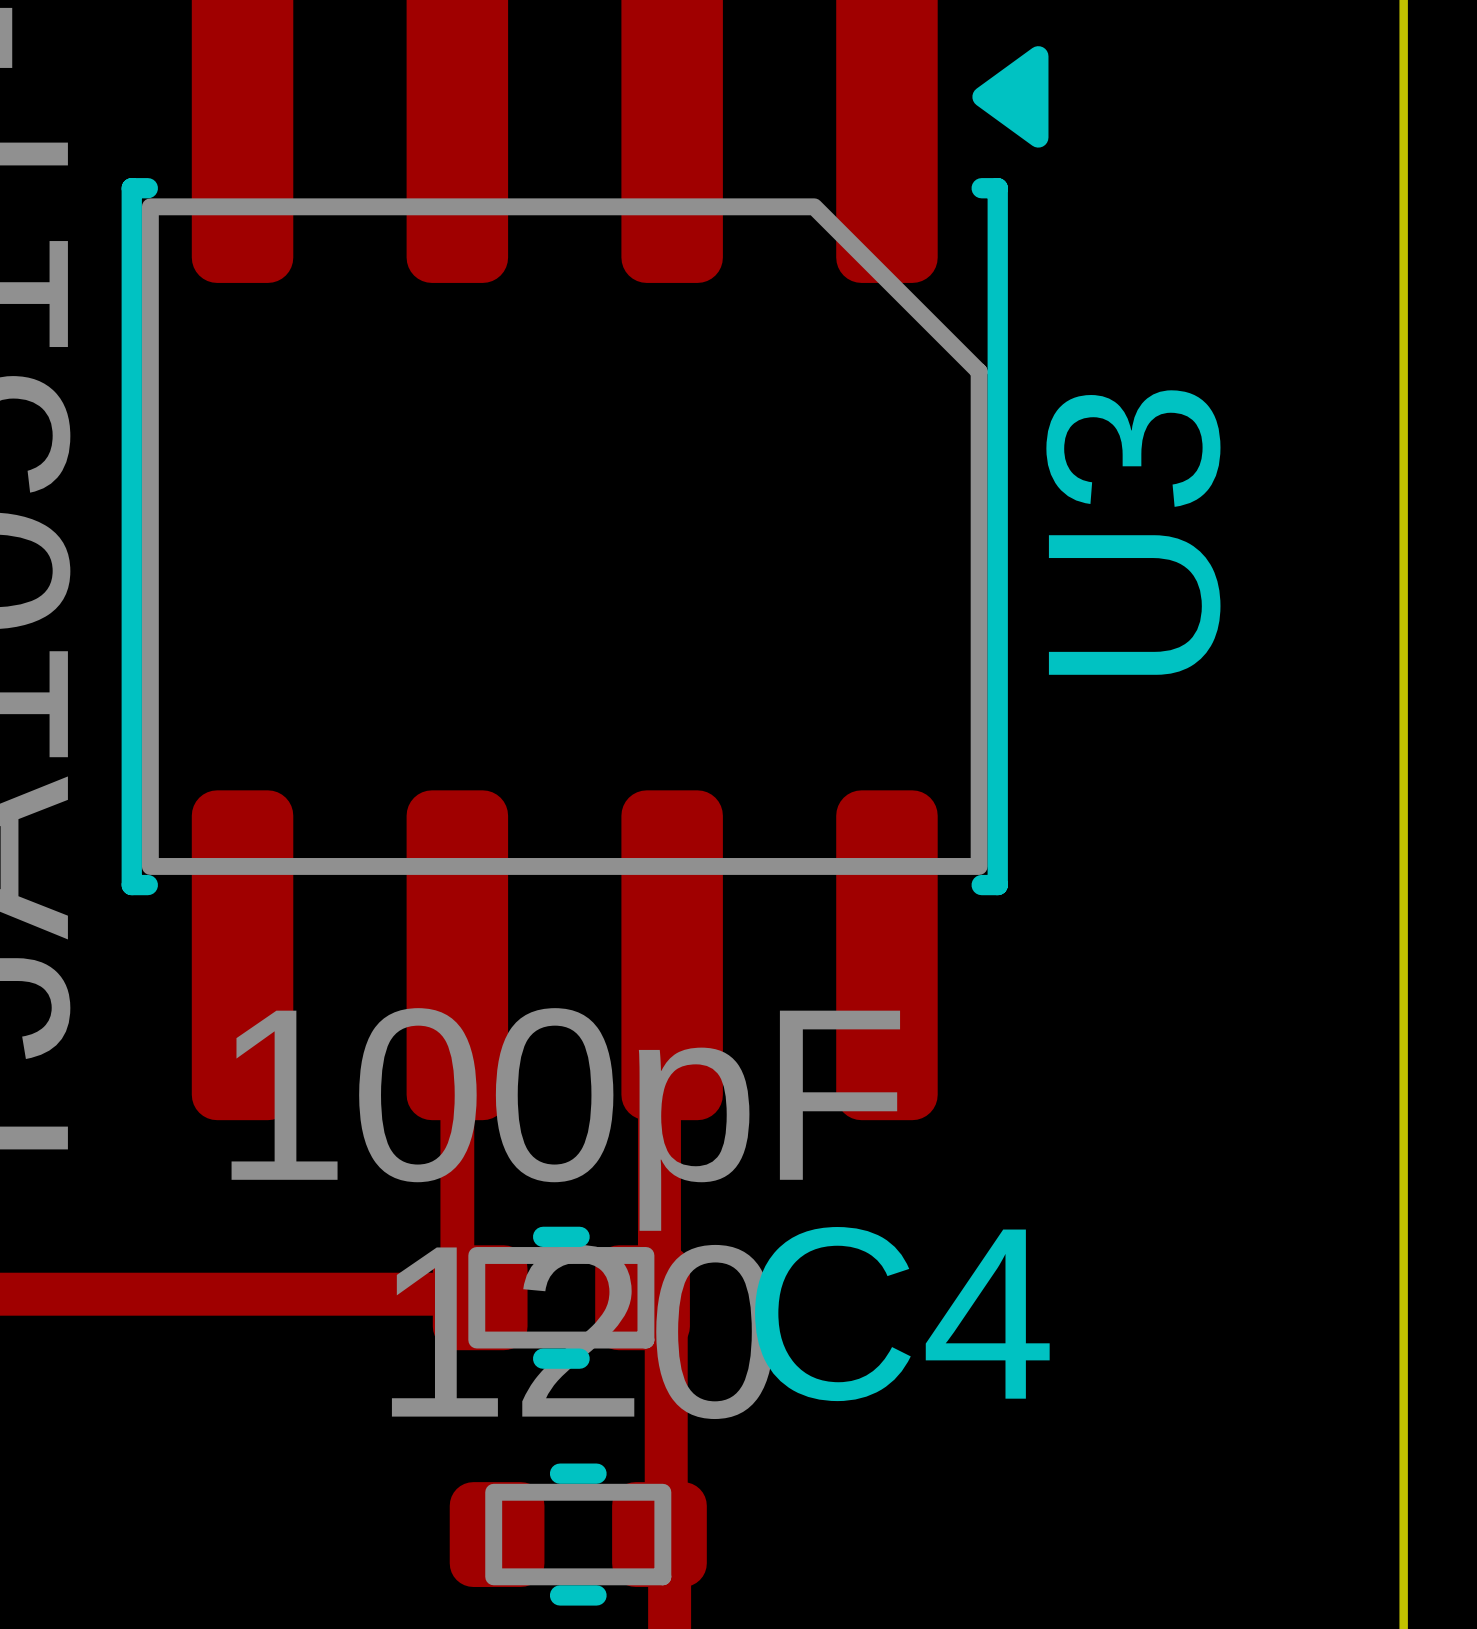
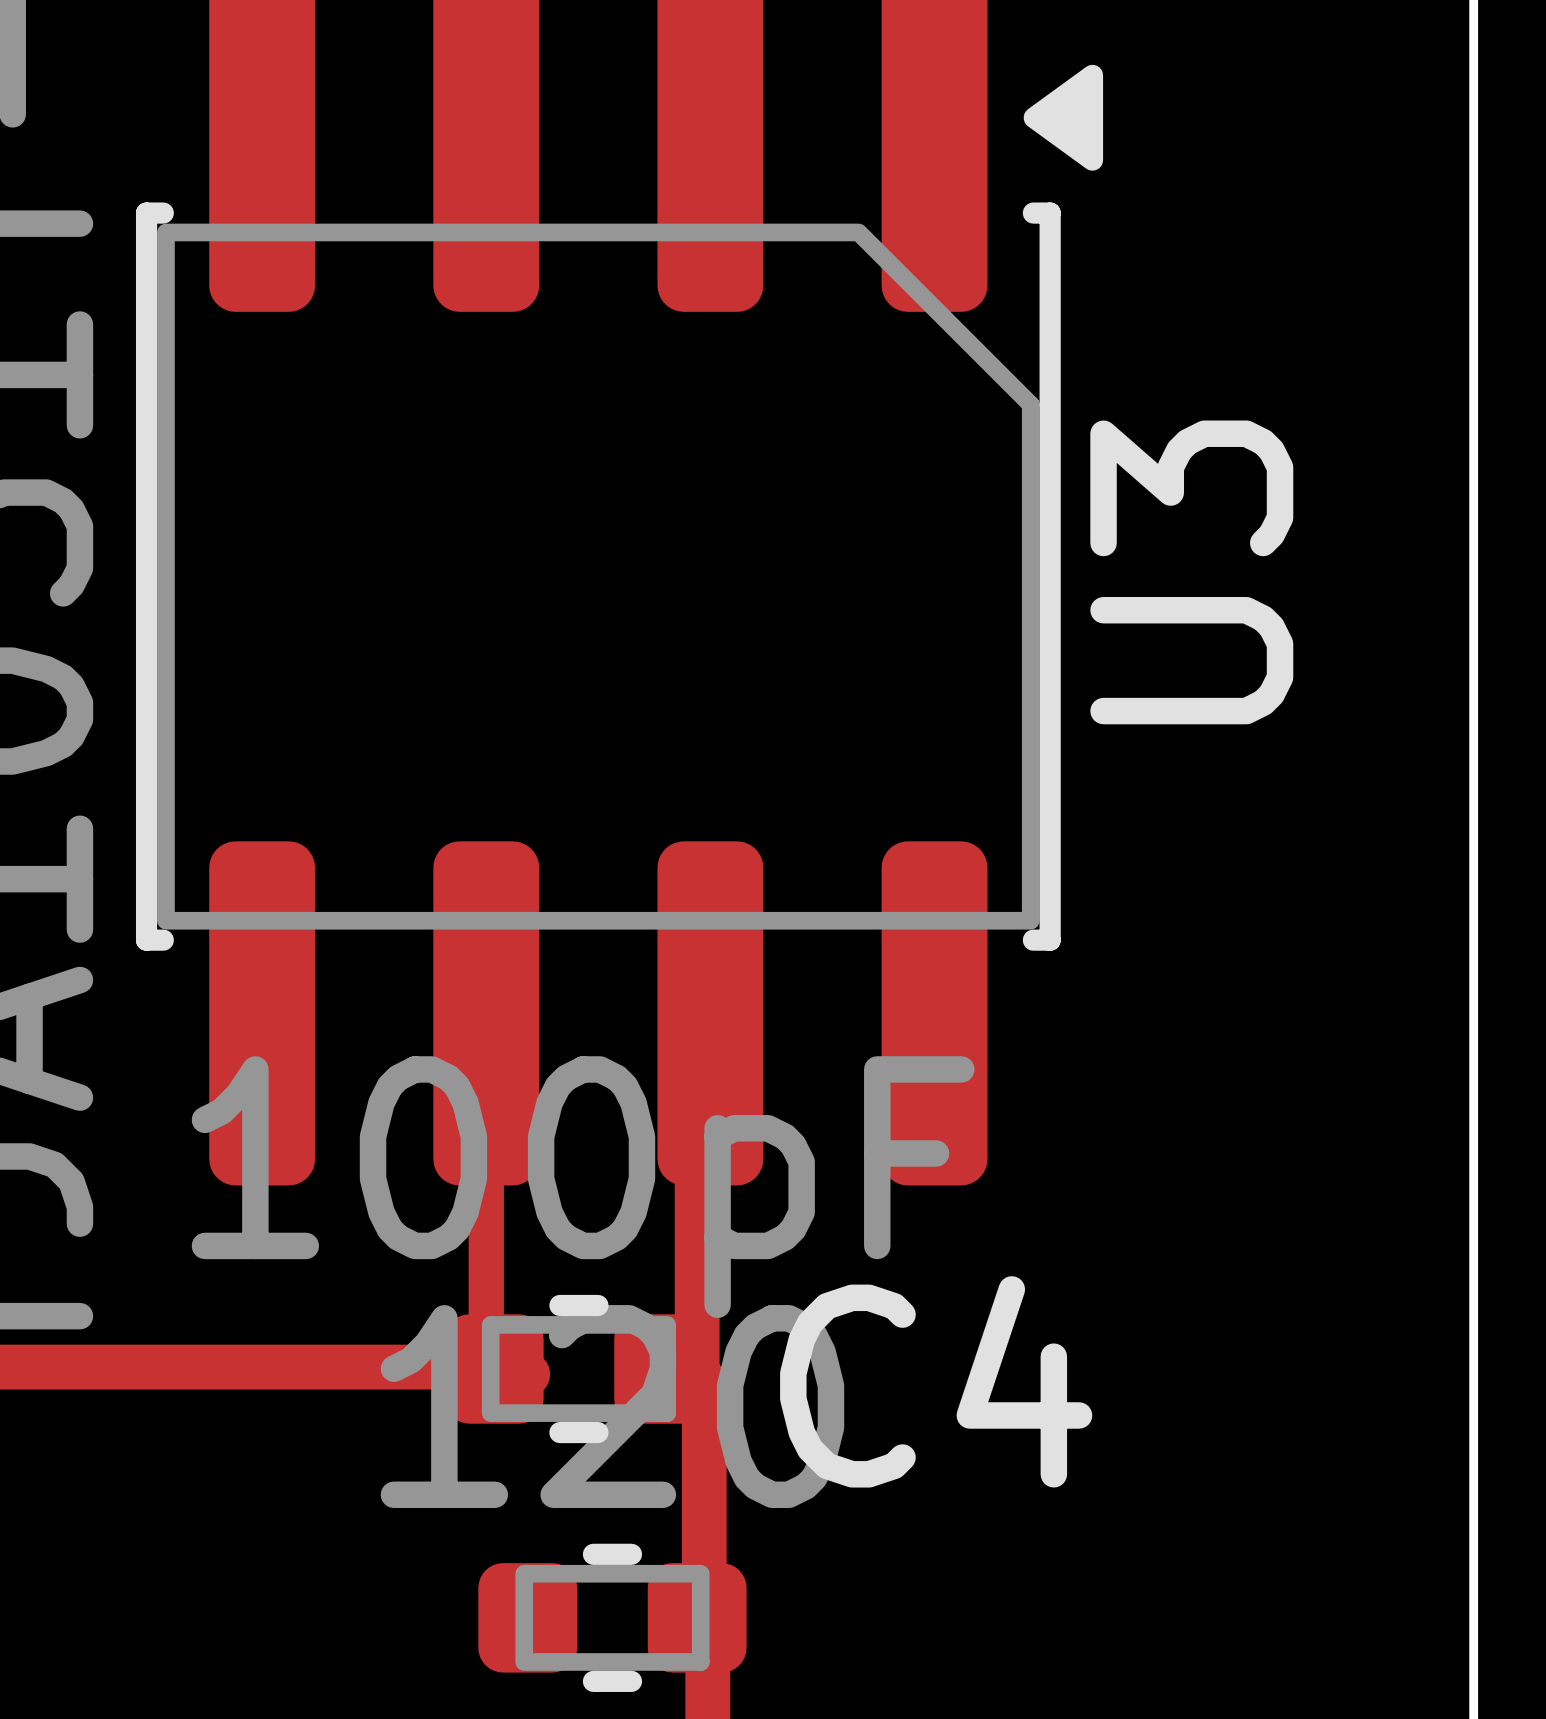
C4 position: (561, 1297) -> (578, 1369)

